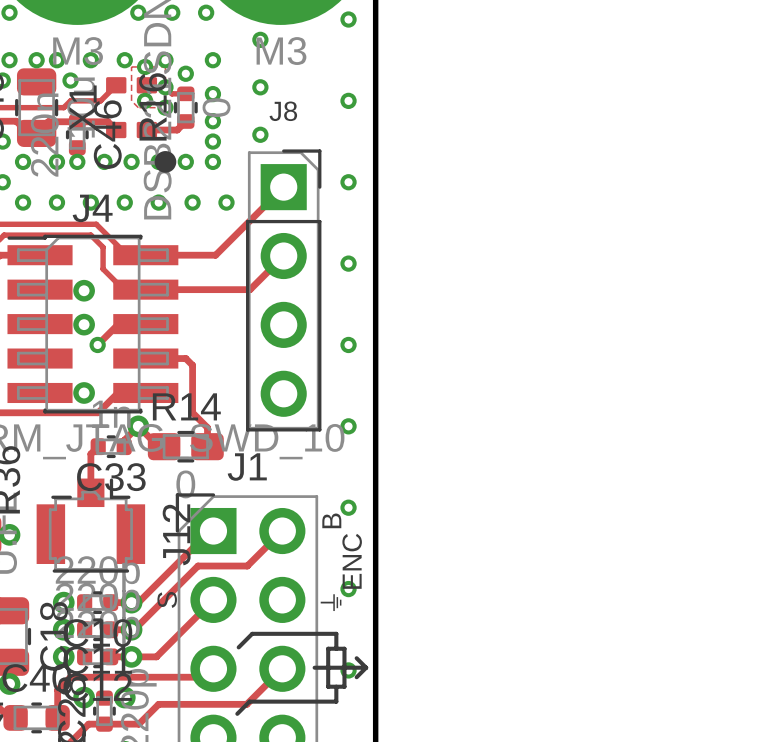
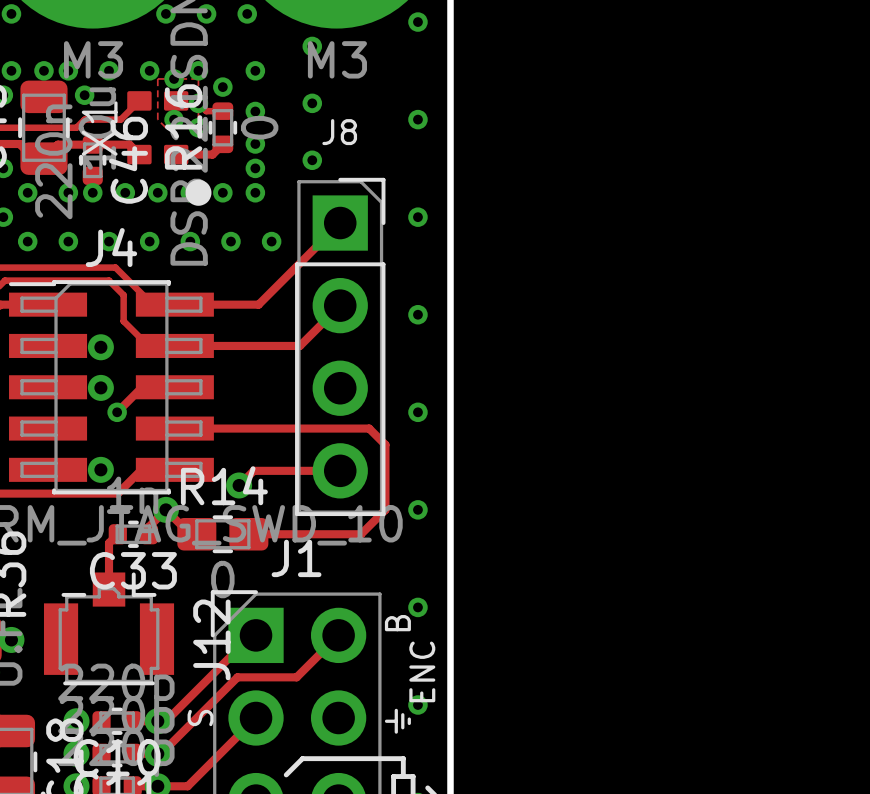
top track: (185, 358) (192, 365) (192, 412) (207, 427) (207, 446) -> (222, 428) (369, 428) (385, 444) (385, 509) (361, 534) (248, 534)
top track: none -> (340, 470) (253, 470) (239, 485)
via: none -> (239, 485)

